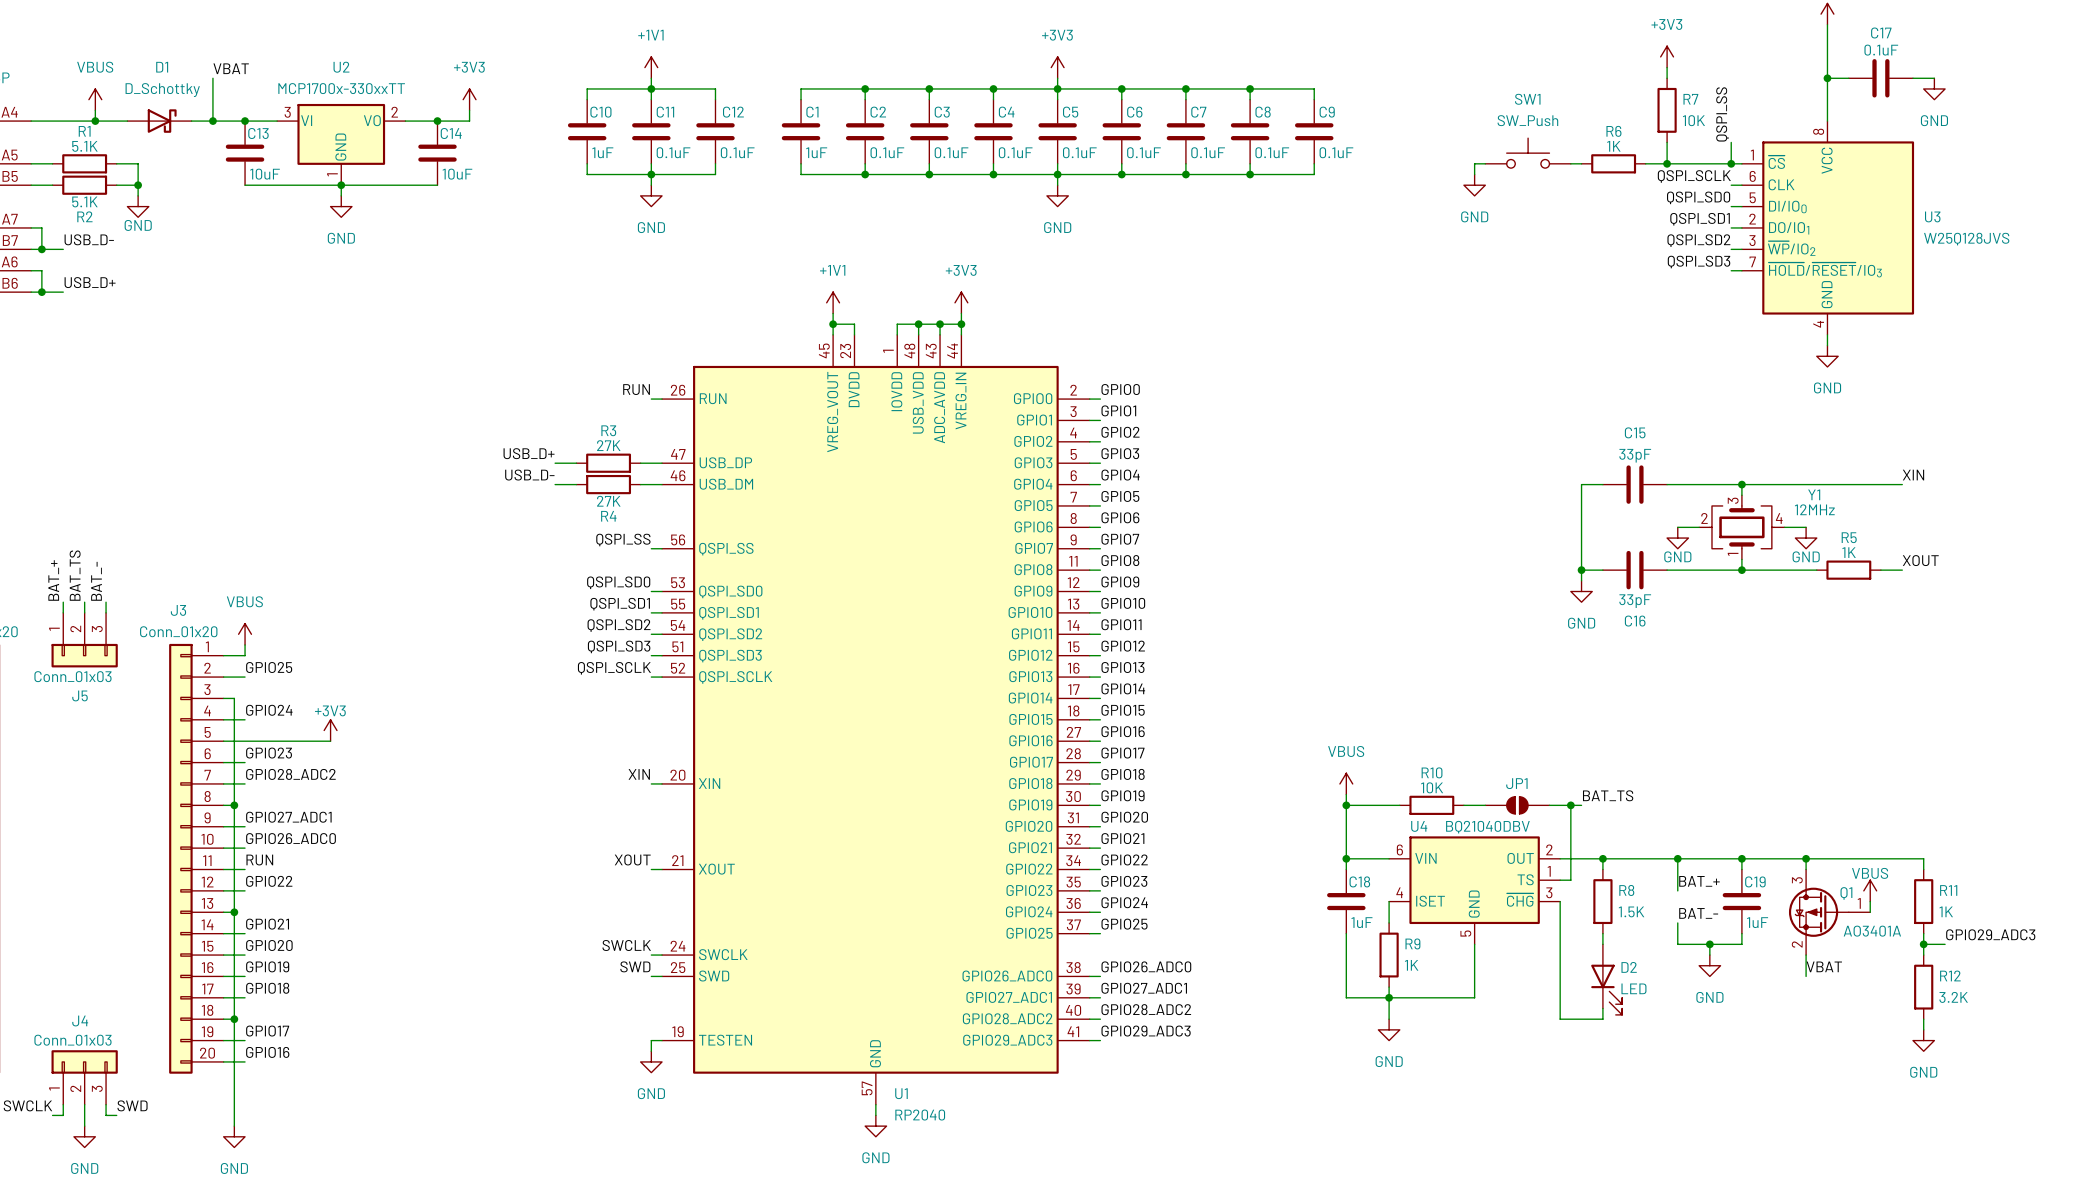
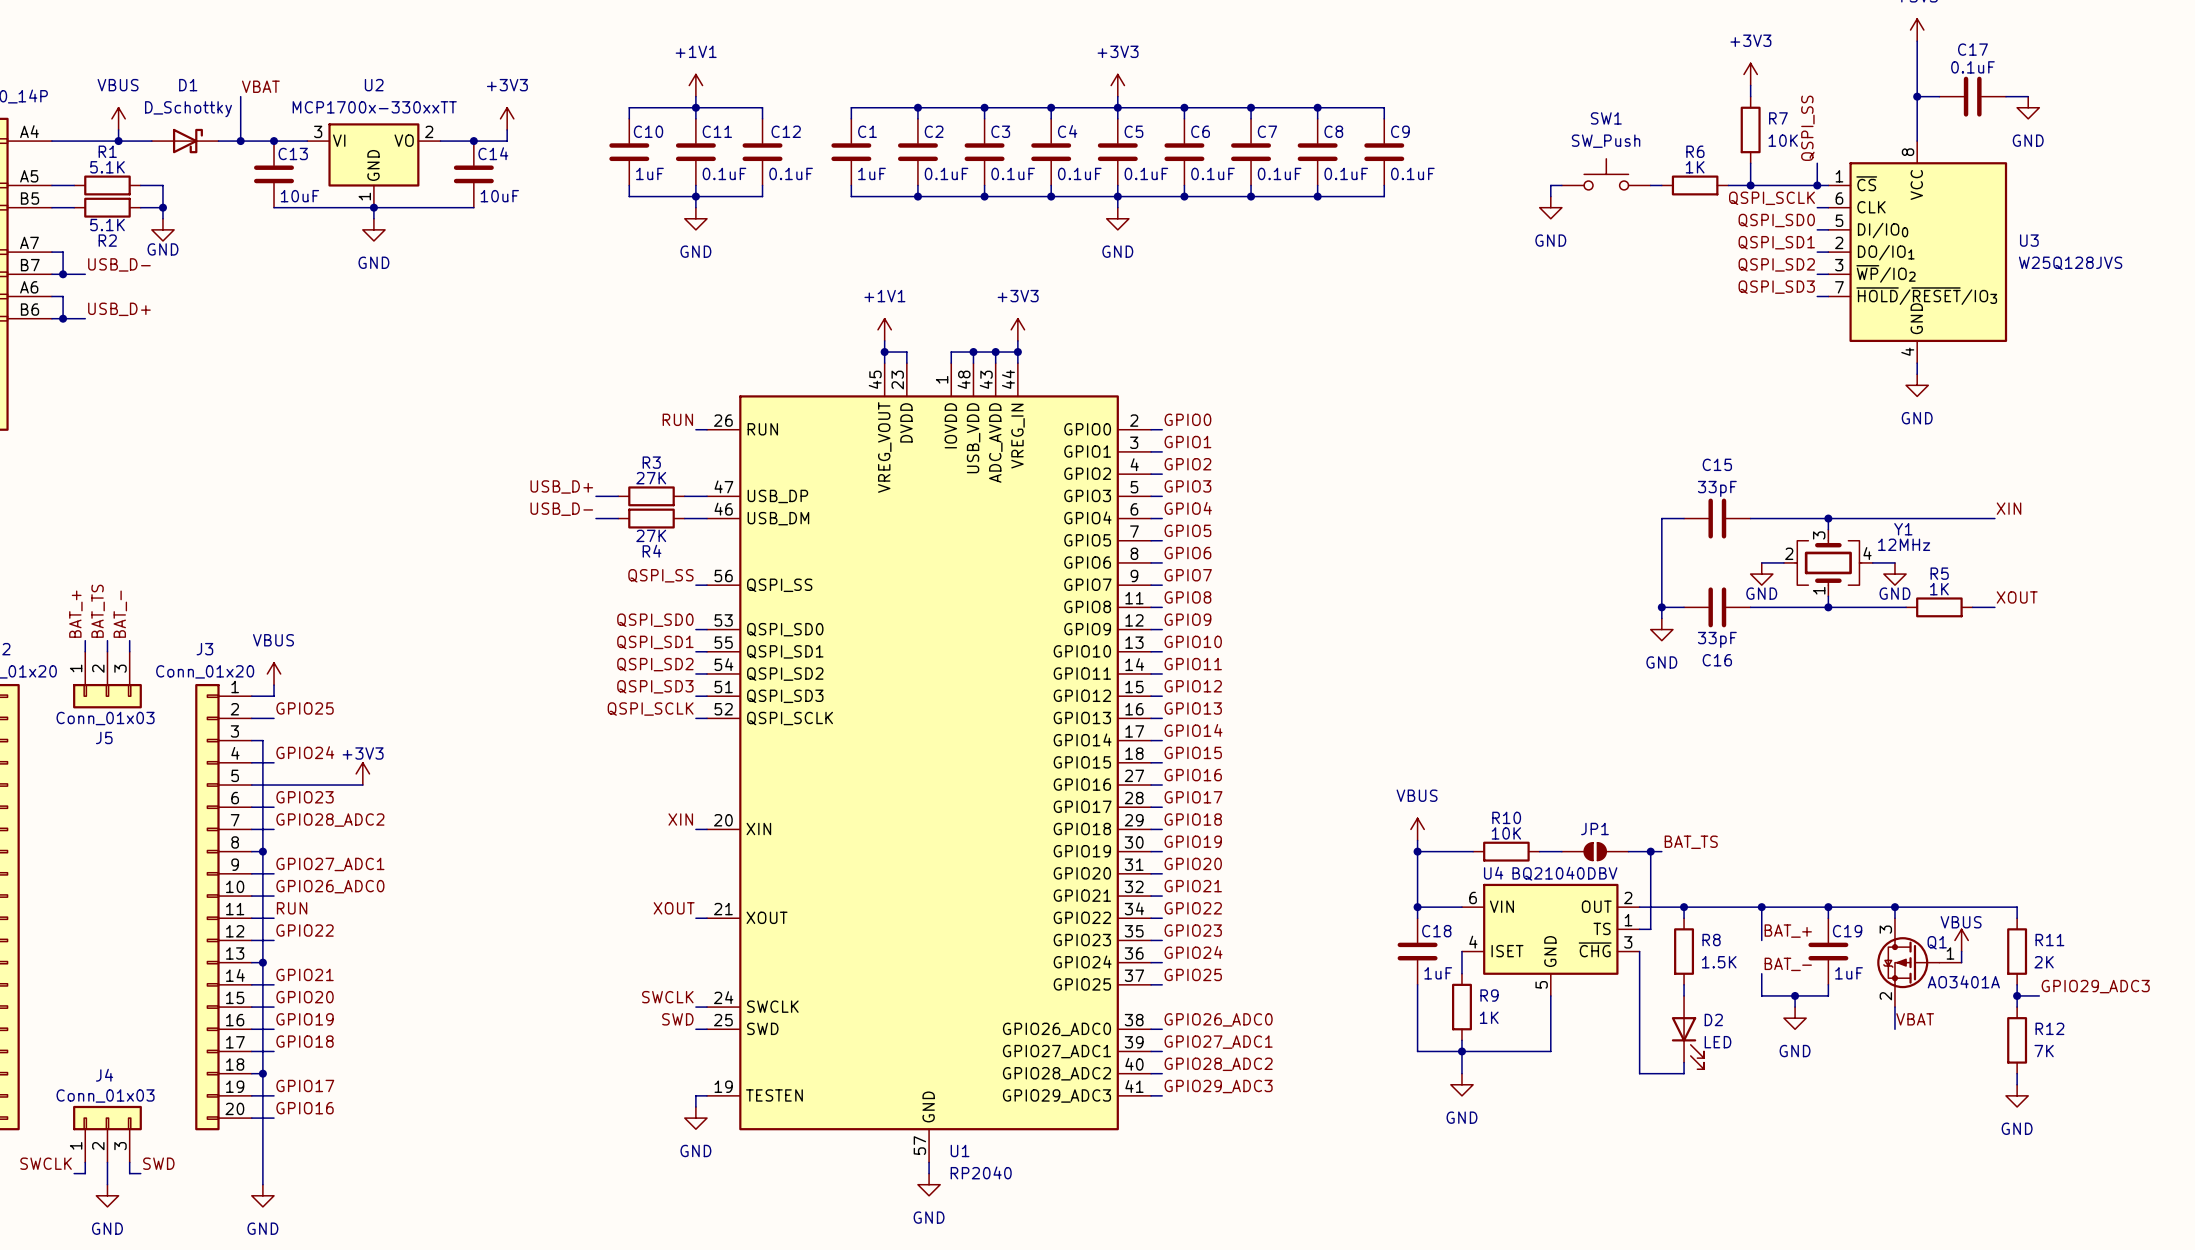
R11 value: 1K (1946, 911) -> 2K (2044, 962)
R12 value: 3.2K (1953, 997) -> 7K (2044, 1051)

